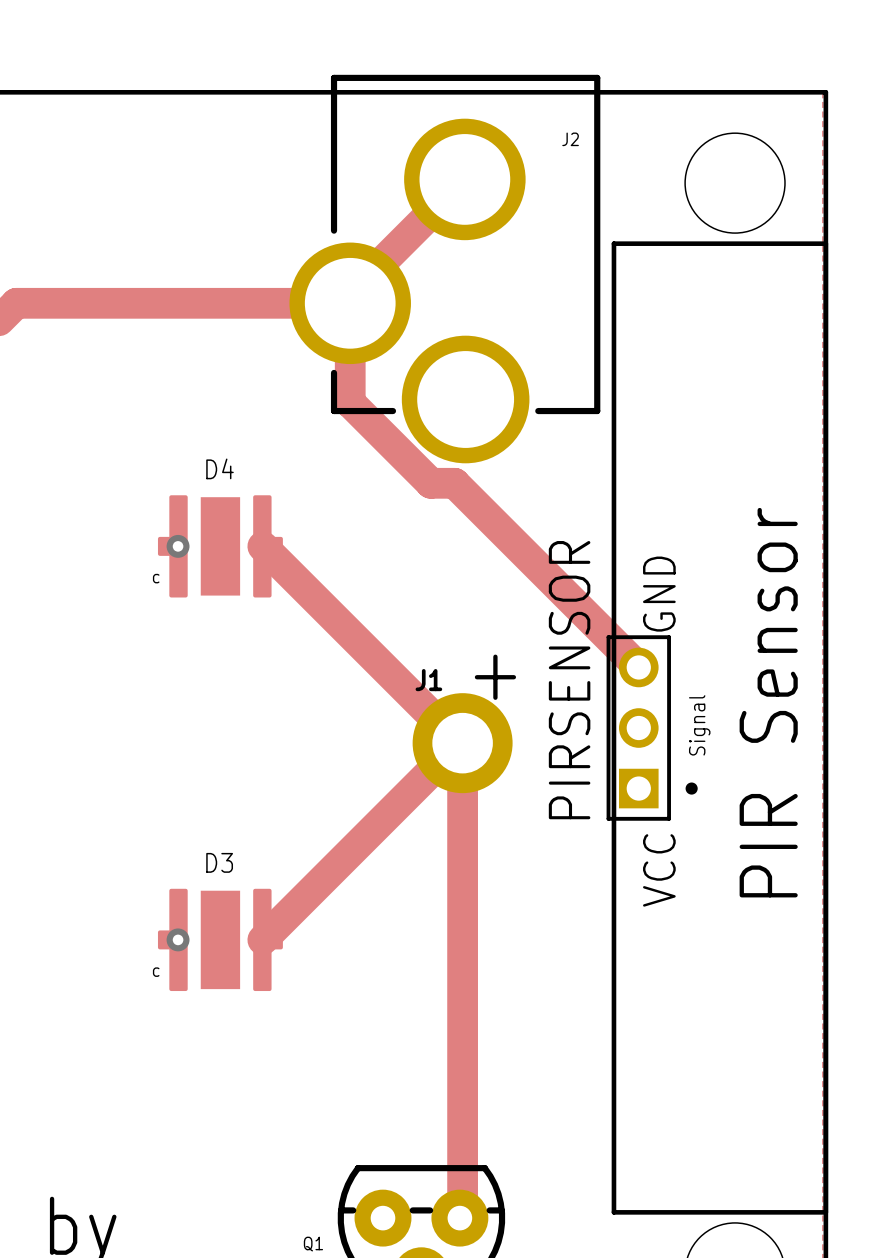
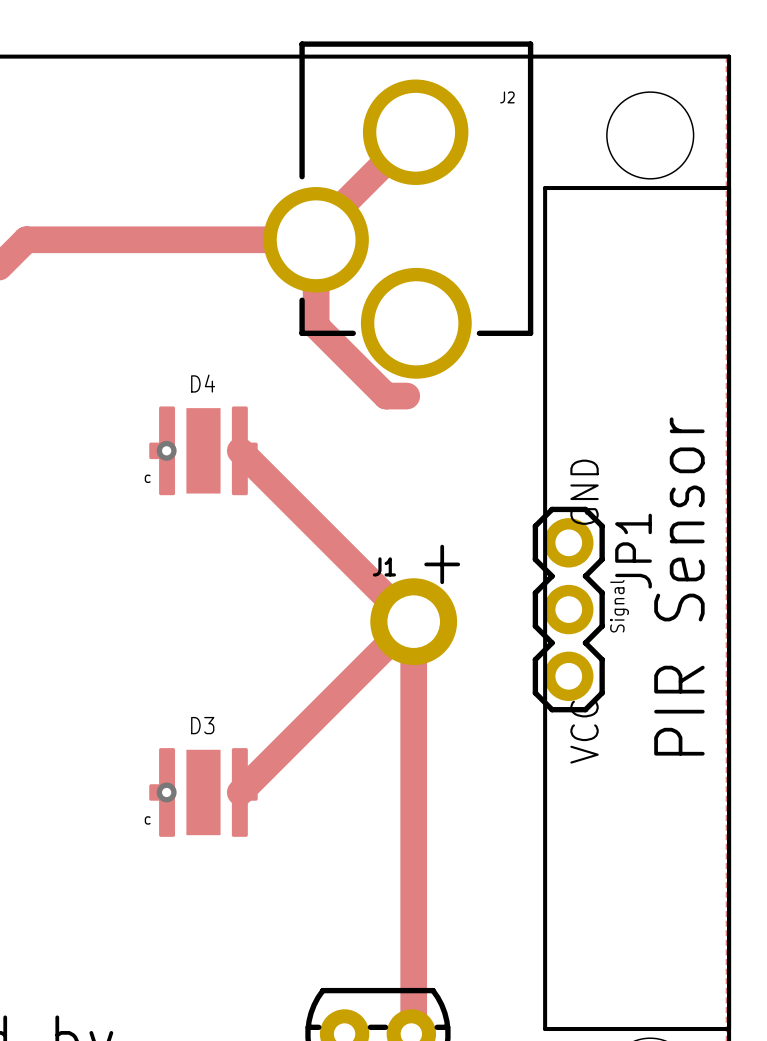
track: (454, 483) (638, 667) -> none
PIRSENSOR: (652, 728) -> none
JP1: none -> (568, 609)

